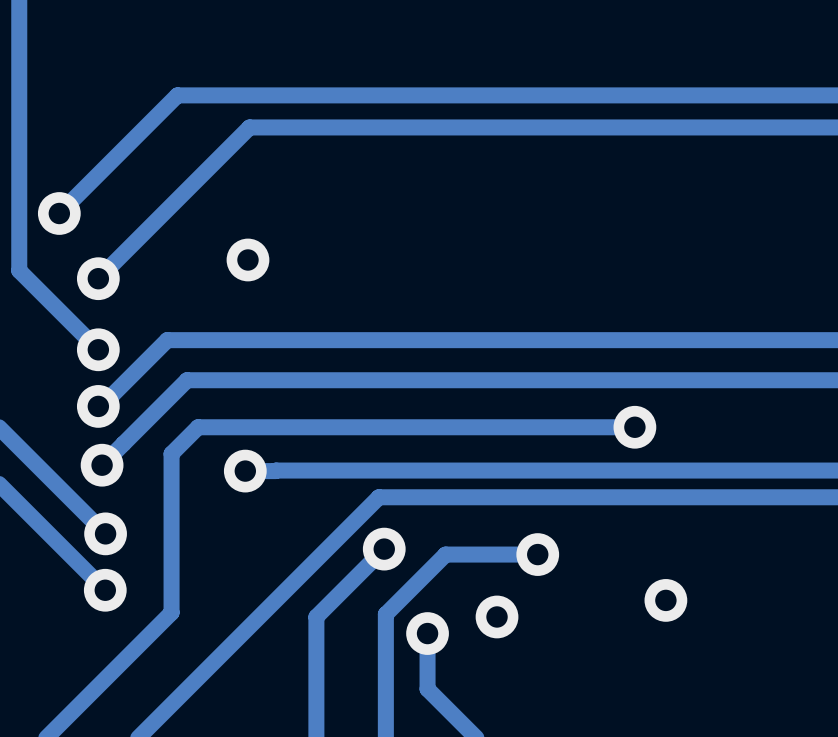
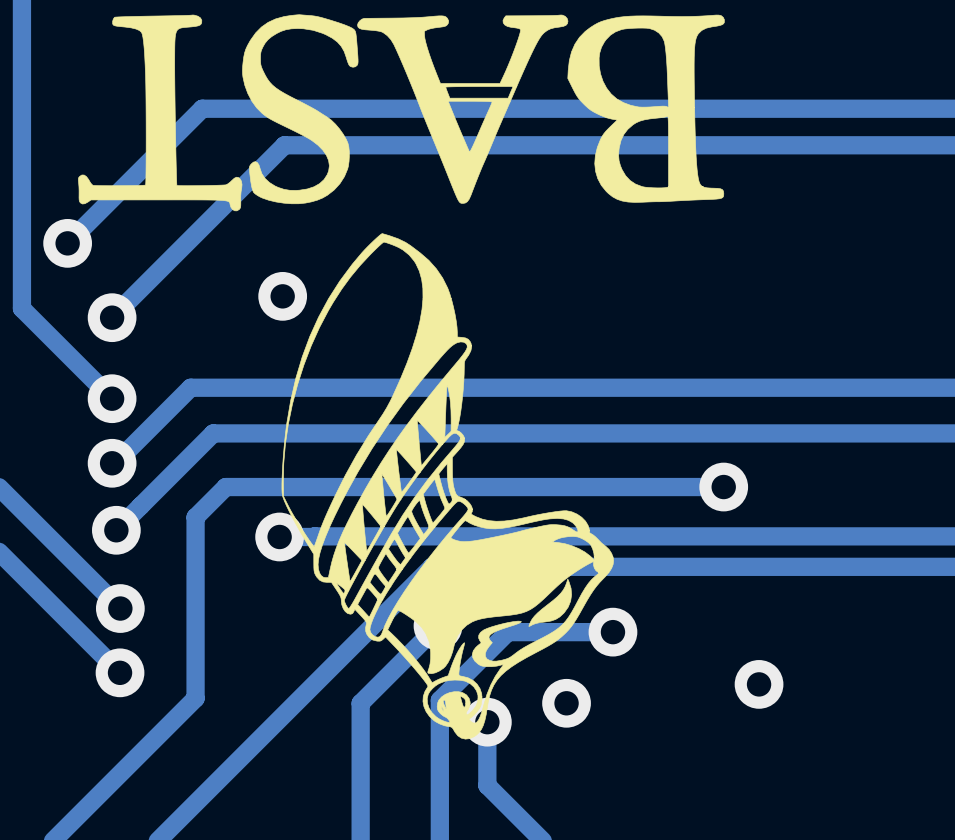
drawing: none -> [78, 14, 725, 740]

